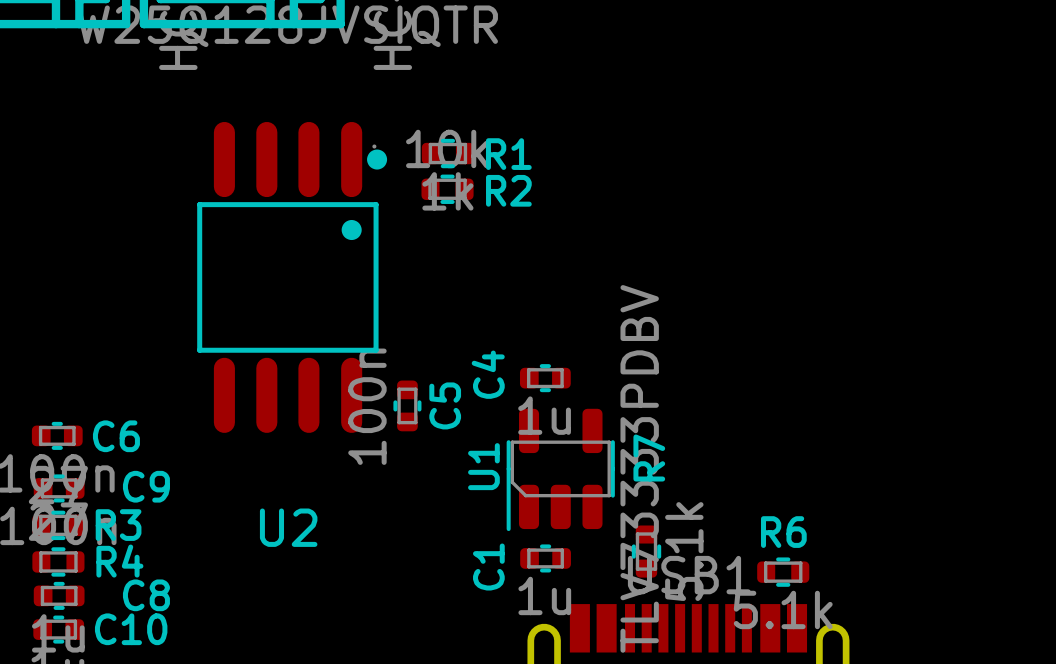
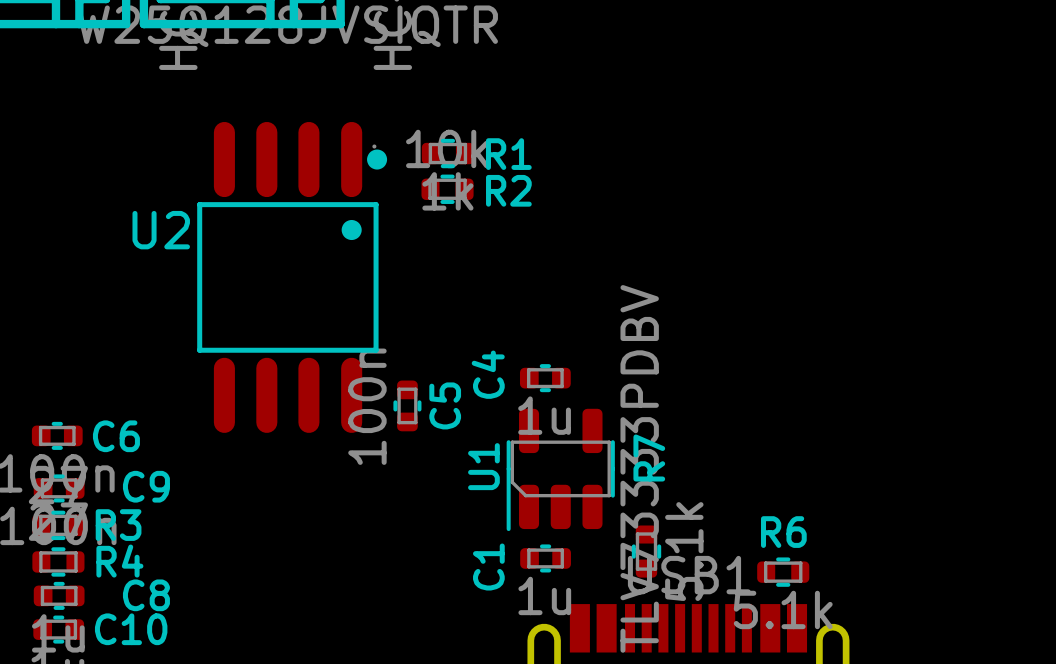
U2 name position: U2 (288, 527) -> U2 (161, 230)

